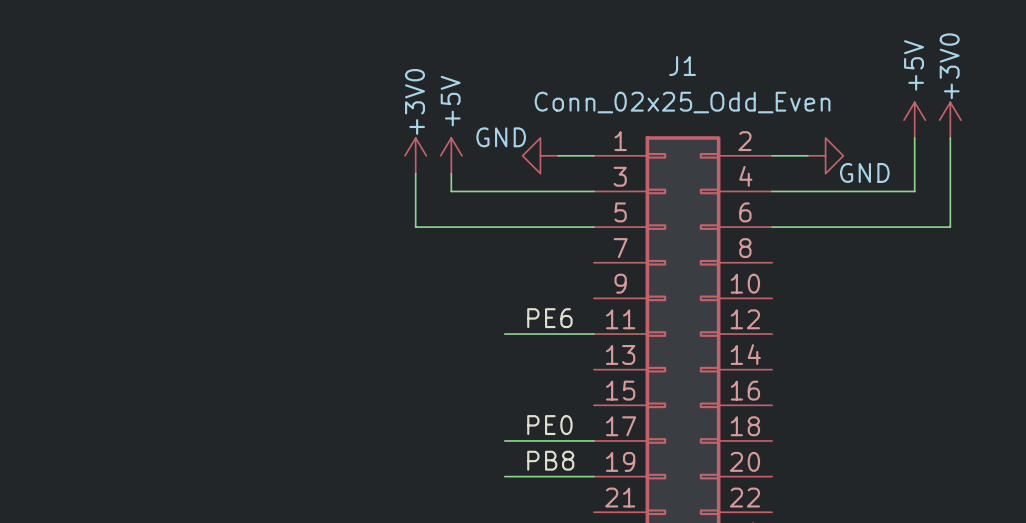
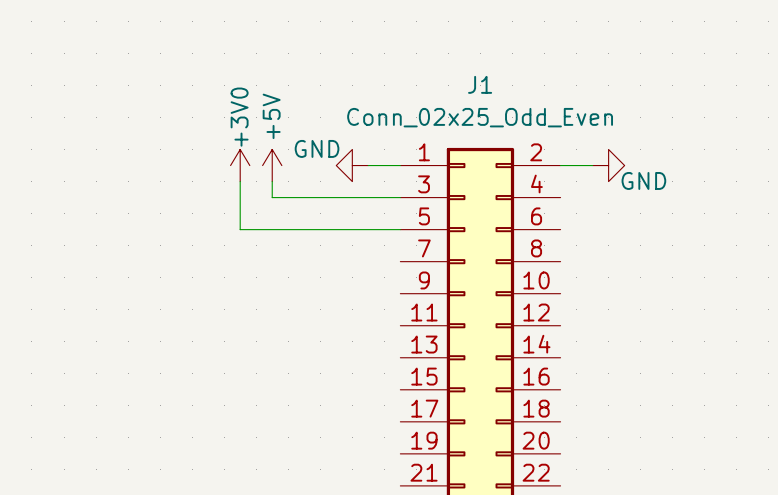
power symbol: +5V (914, 120) -> none
power symbol: +3V0 (950, 120) -> none
wire: (914, 137) (914, 191) (772, 191) -> none
wire: (950, 137) (950, 227) (772, 227) -> none
label: PE6 (549, 318) -> none
wire: (504, 334) (593, 334) -> none
label: PE0 (549, 425) -> none
wire: (504, 440) (593, 440) -> none
label: PB8 (550, 460) -> none
wire: (504, 476) (593, 476) -> none

